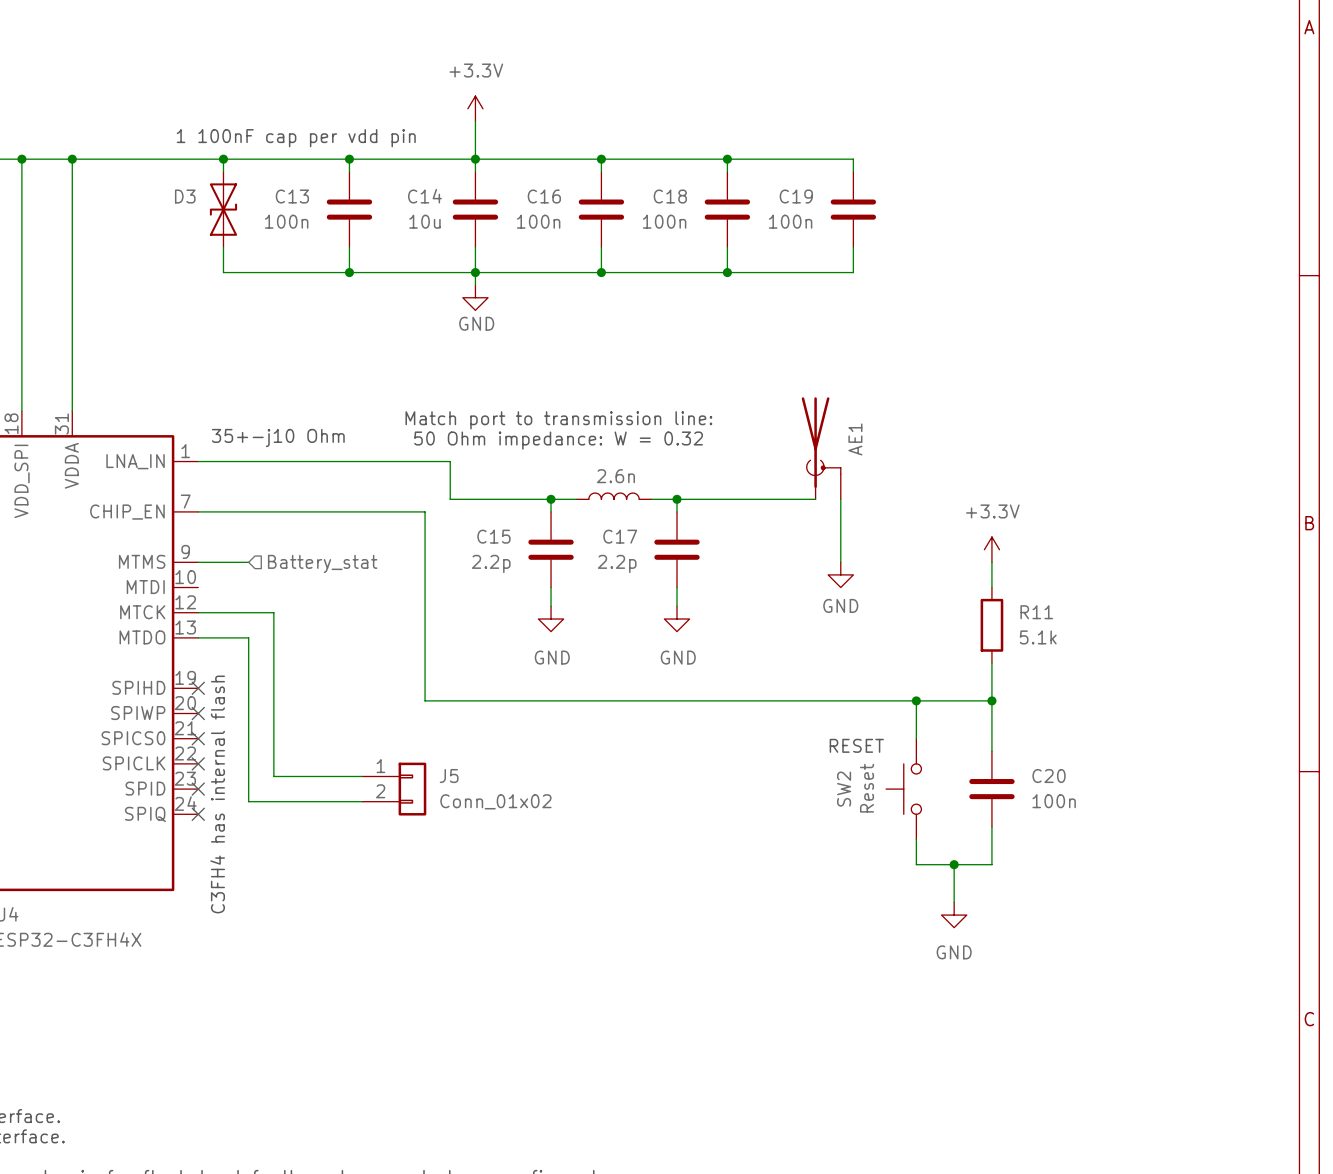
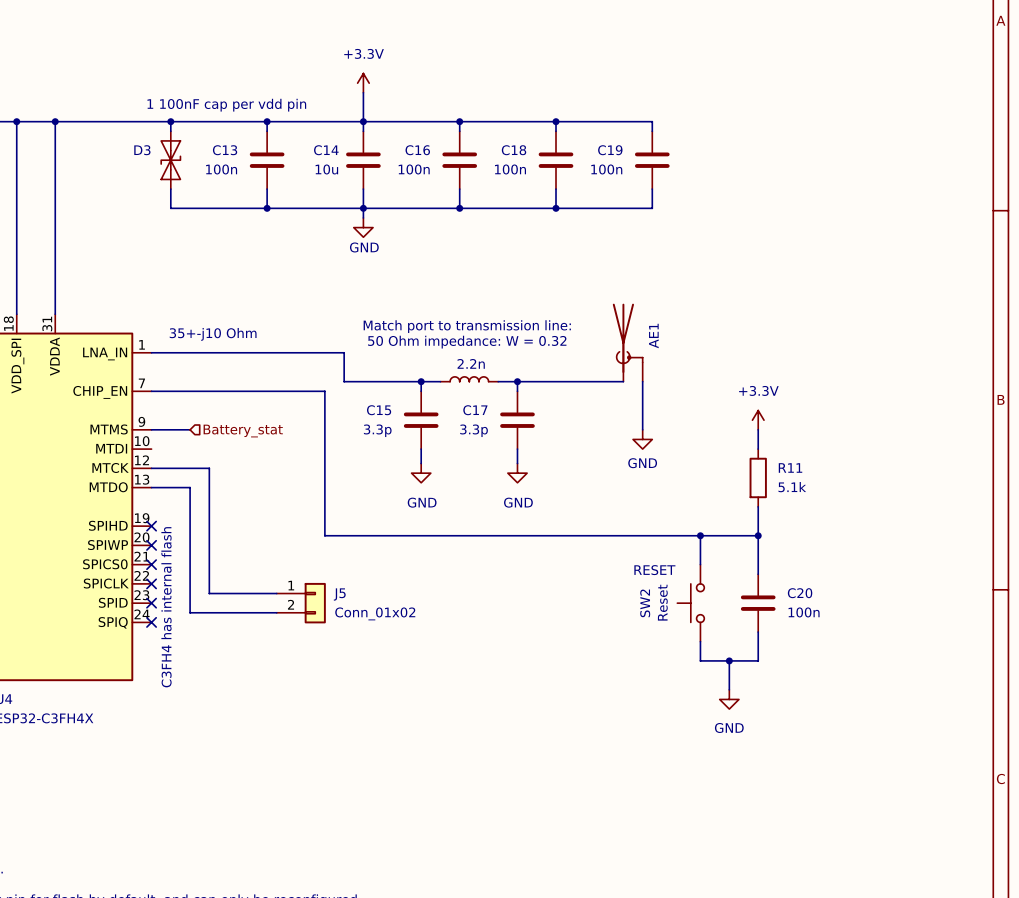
text position: Match port to transmission line: (558, 420) -> Match port to transmission line: (467, 326)
text position: 50 Ohm impedance: W = 0.32 (558, 440) -> 50 Ohm impedance: W = 0.32 (467, 342)
part value: 2.6n (615, 476) -> 2.2n (471, 363)
C15 value: 2.2p (491, 563) -> 3.3p (377, 430)
C17 value: 2.2p (617, 563) -> 3.3p (474, 430)

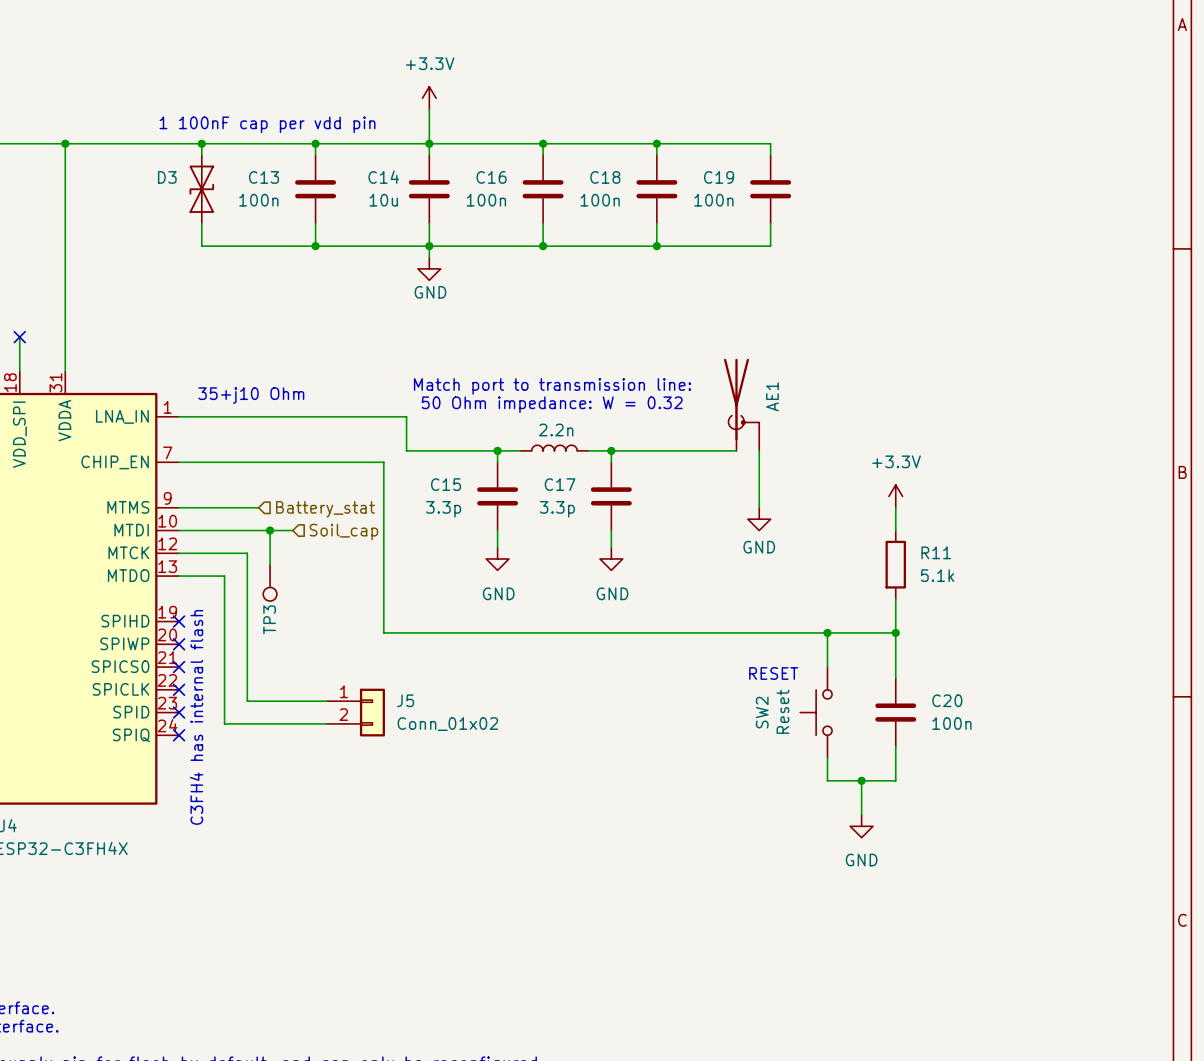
wire: (16, 121) (16, 285) -> none
junction: (16, 121) -> none
no-connect mark: none -> (19, 337)
text: 35+-j10 Ohm (213, 334) -> 35+j10 Ohm (251, 395)
wire: none -> (224, 507) (258, 507)
hierarchical label position: Battery_stat (243, 431) -> Battery_stat (325, 509)
wire: none -> (179, 530) (292, 530)
wire: none -> (270, 530) (270, 564)
junction: none -> (270, 530)
hierarchical label: none -> Soil_cap (343, 532)
TP3: none -> (270, 582)

